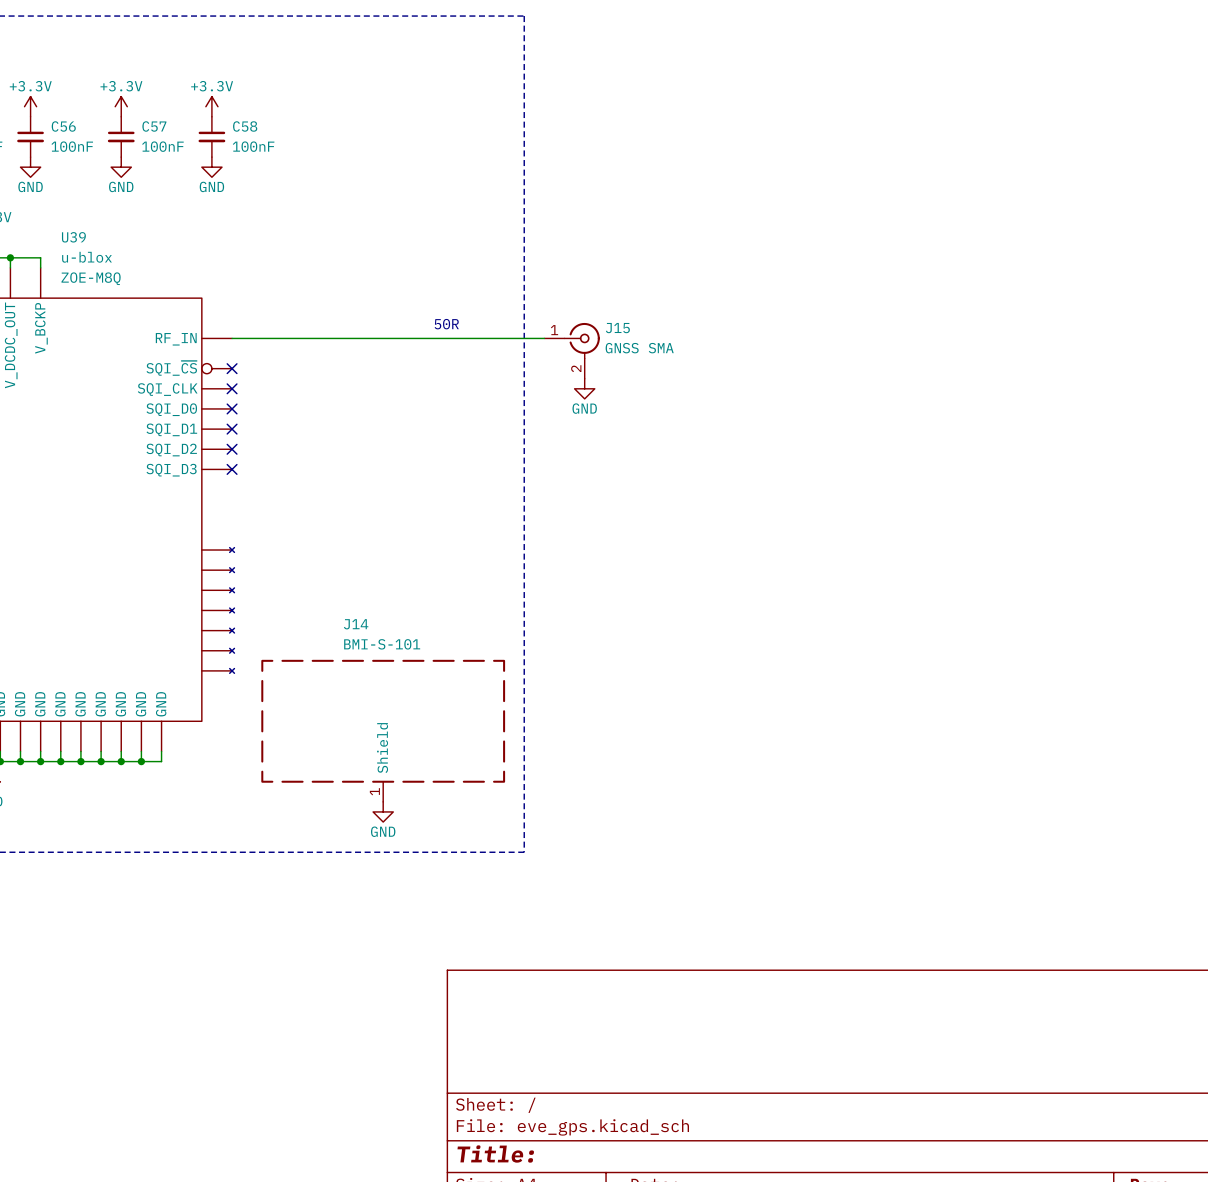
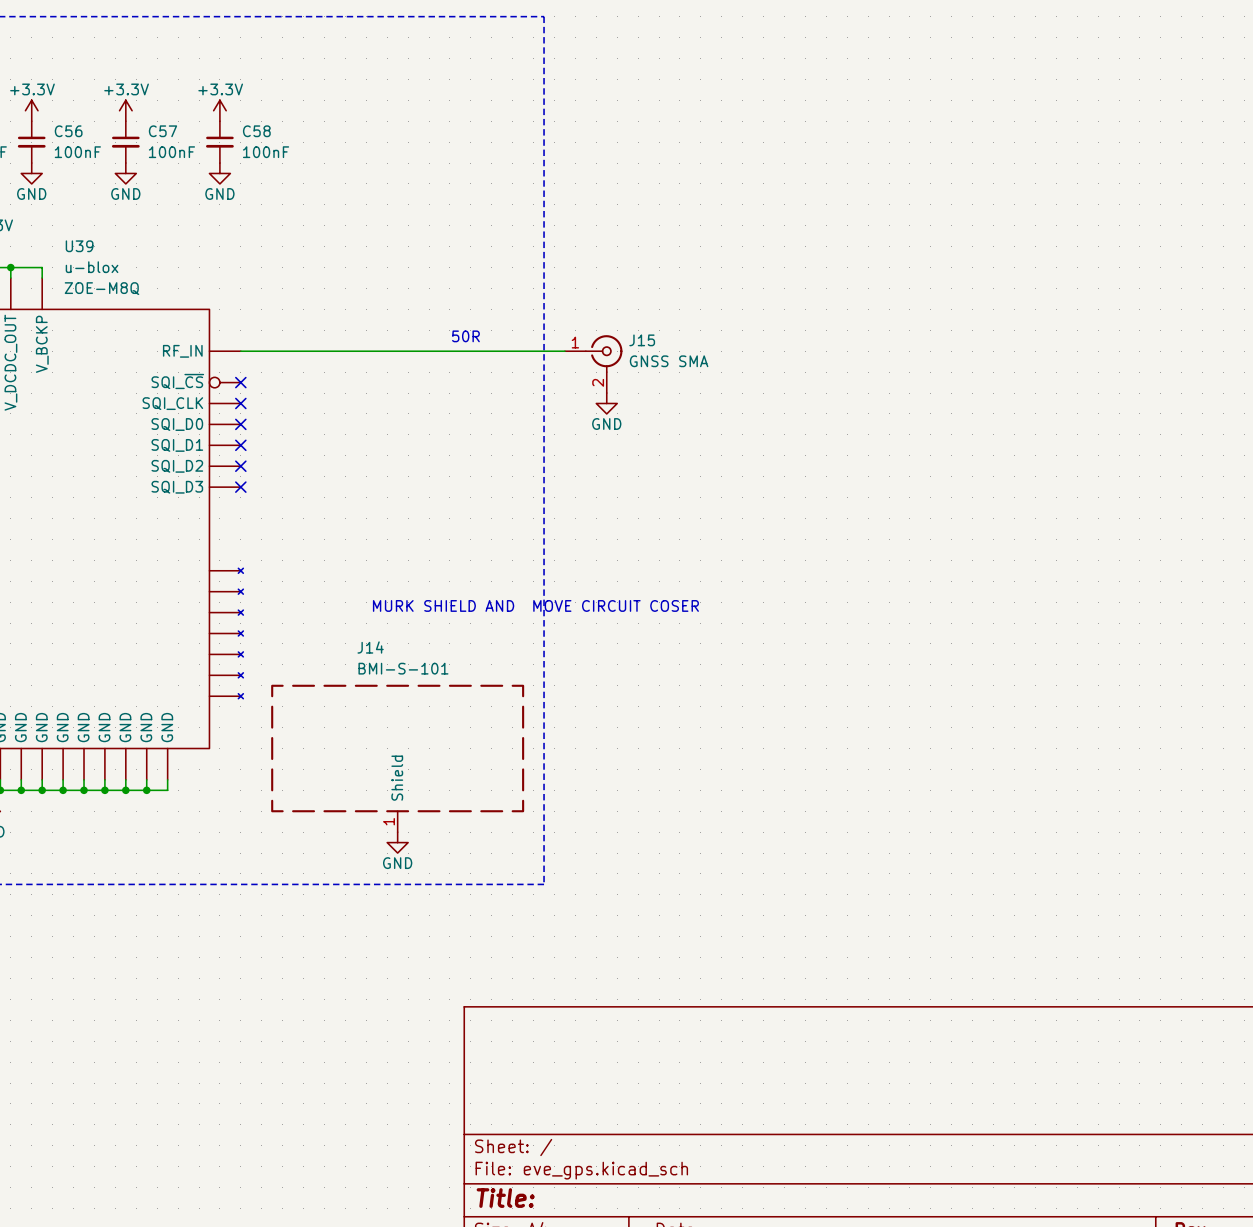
text: none -> MURK SHIELD AND MOVE CIRCUIT COSER (535, 605)

